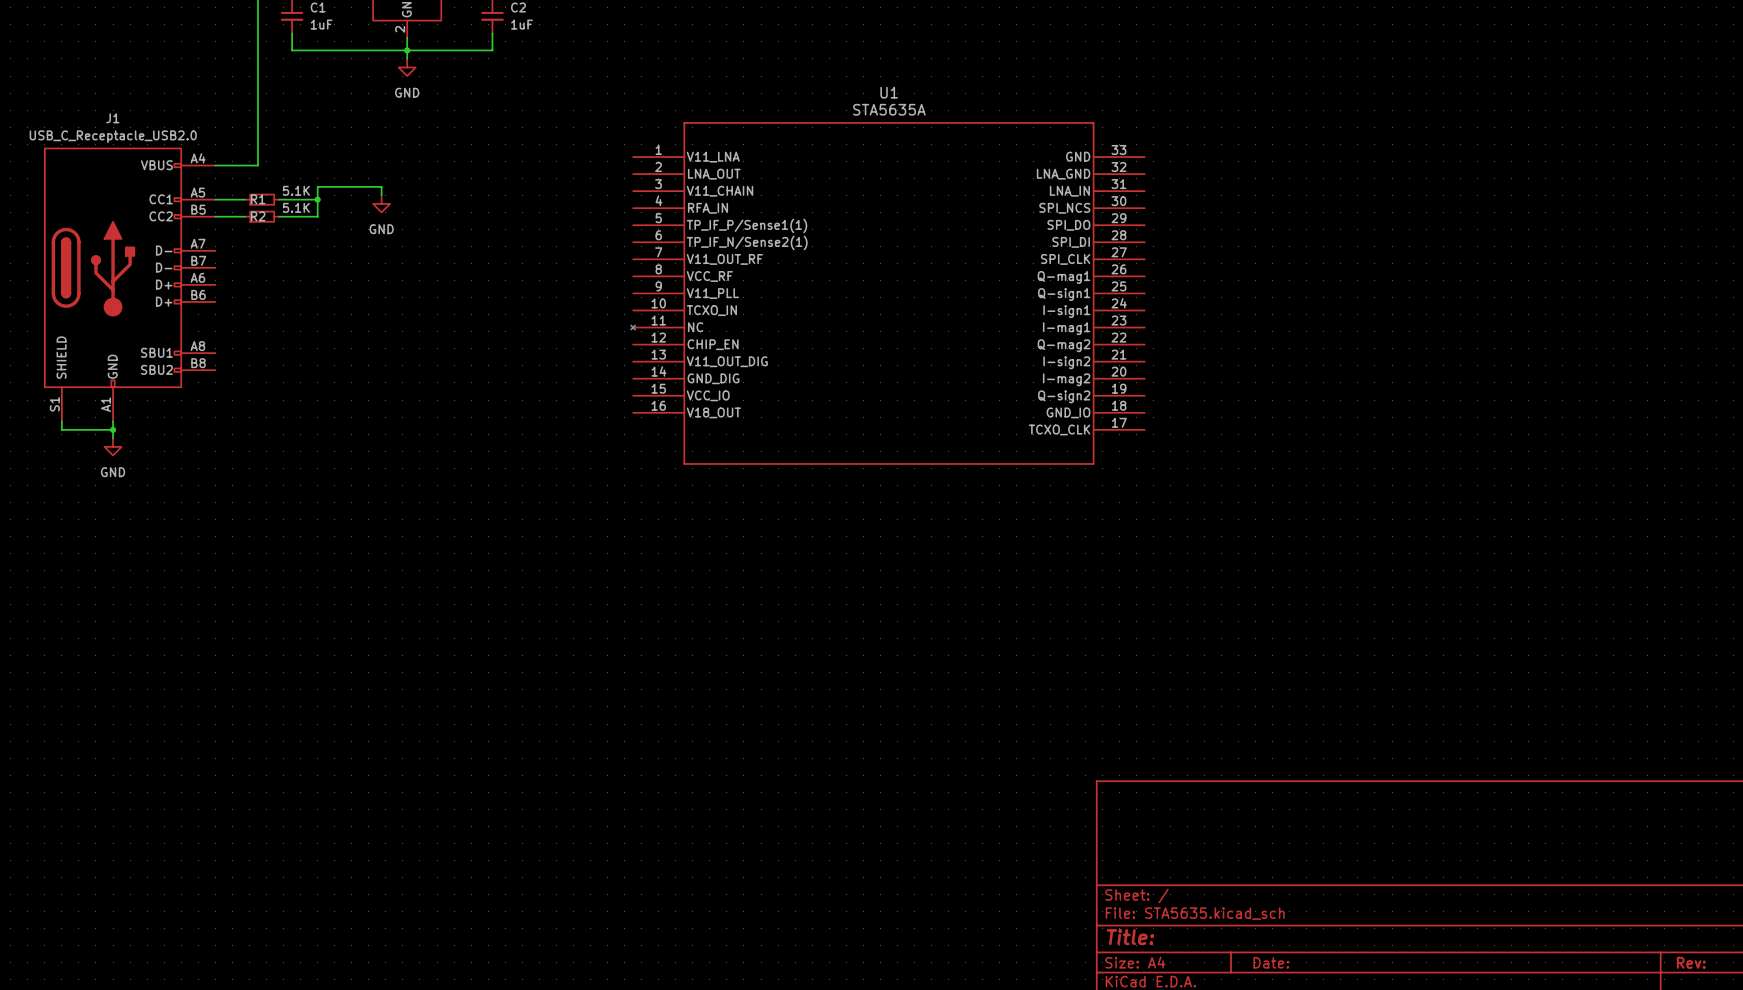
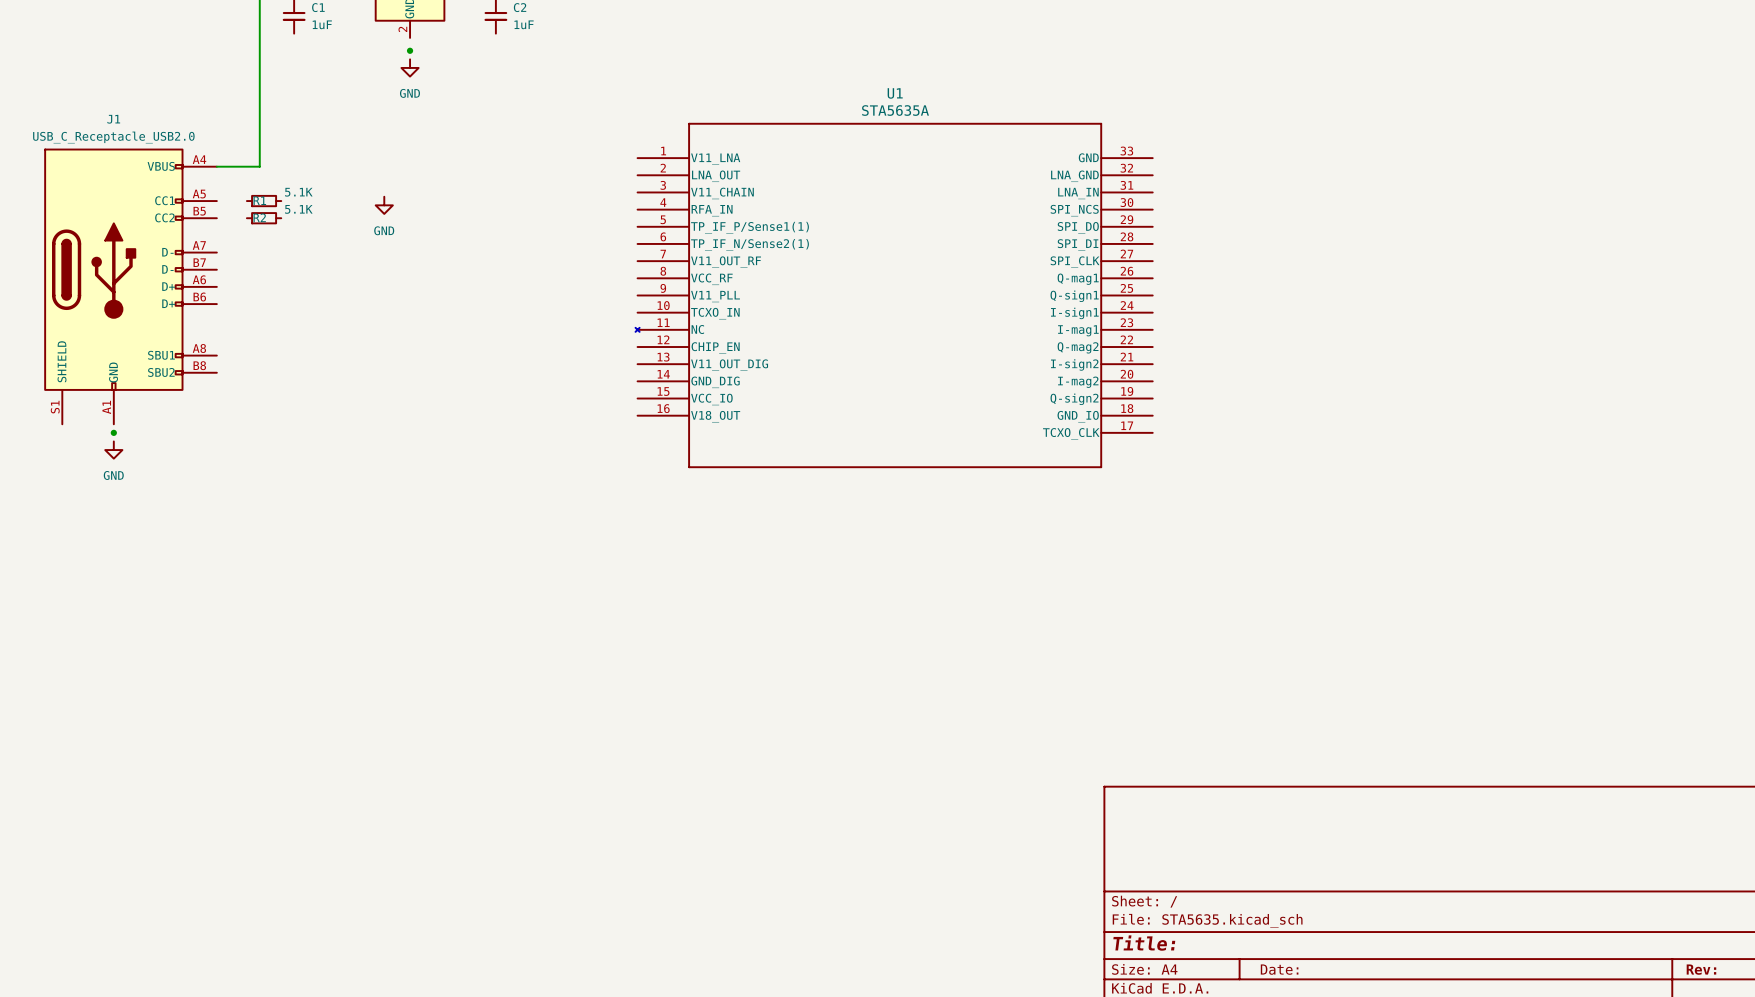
wire: (292, 33) (292, 50) (492, 50) (492, 33) -> none
wire: (407, 37) (407, 58) -> none
wire: (381, 195) (381, 186) (317, 186) (317, 216) (279, 216) -> none
wire: (215, 199) (245, 199) -> none
wire: (279, 199) (317, 199) -> none
junction: (317, 199) -> none
wire: (215, 216) (245, 216) -> none
wire: (61, 421) (61, 429) (113, 429) -> none
wire: (113, 421) (113, 438) -> none

